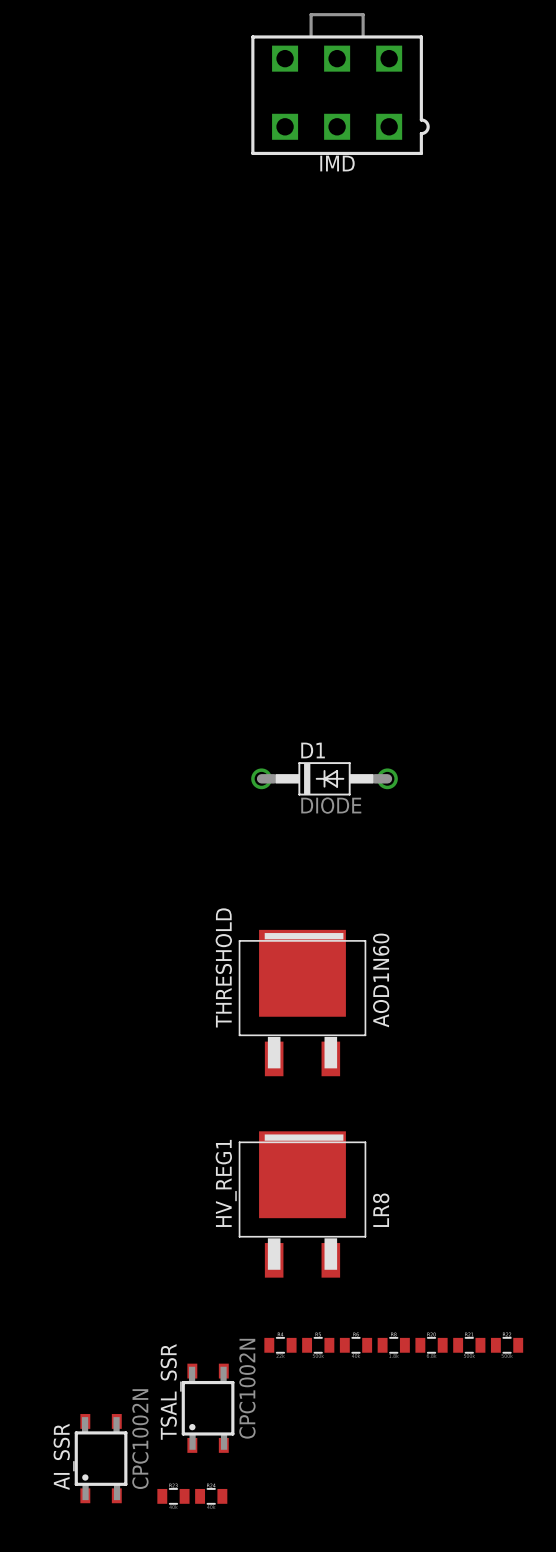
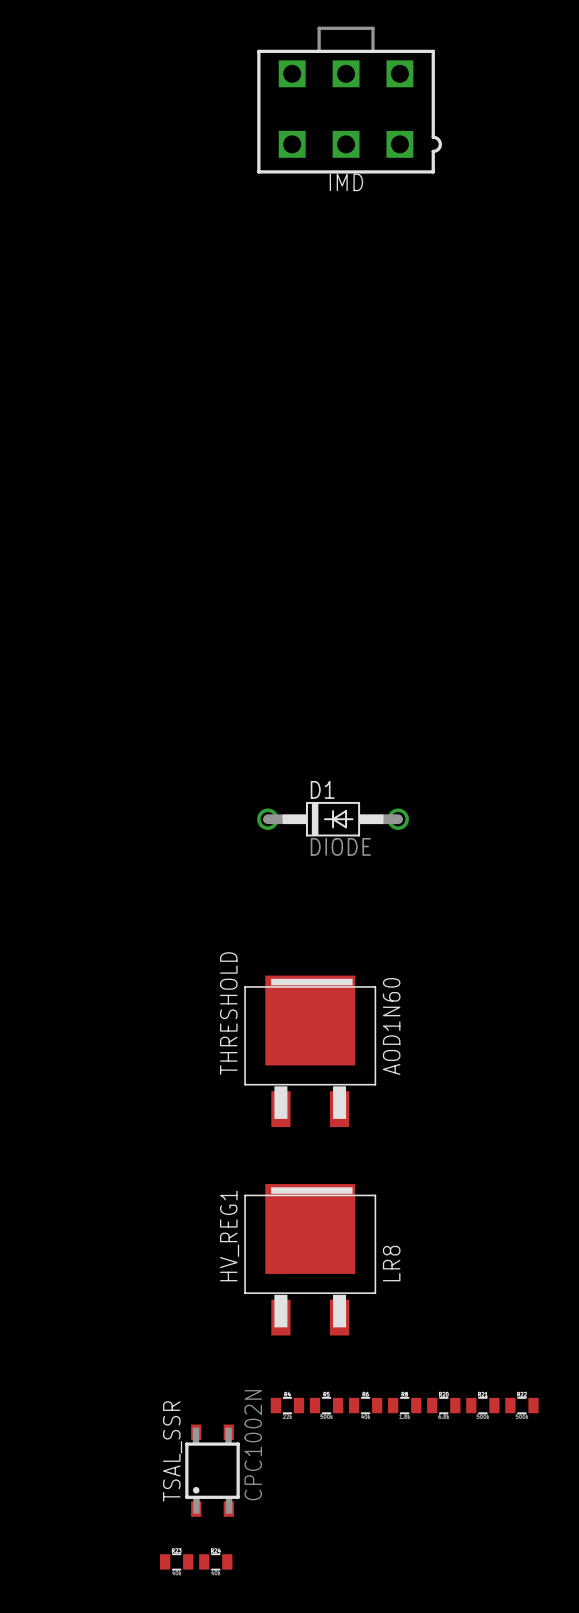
AI_SSR: CPC1002N (101, 1458) -> none

